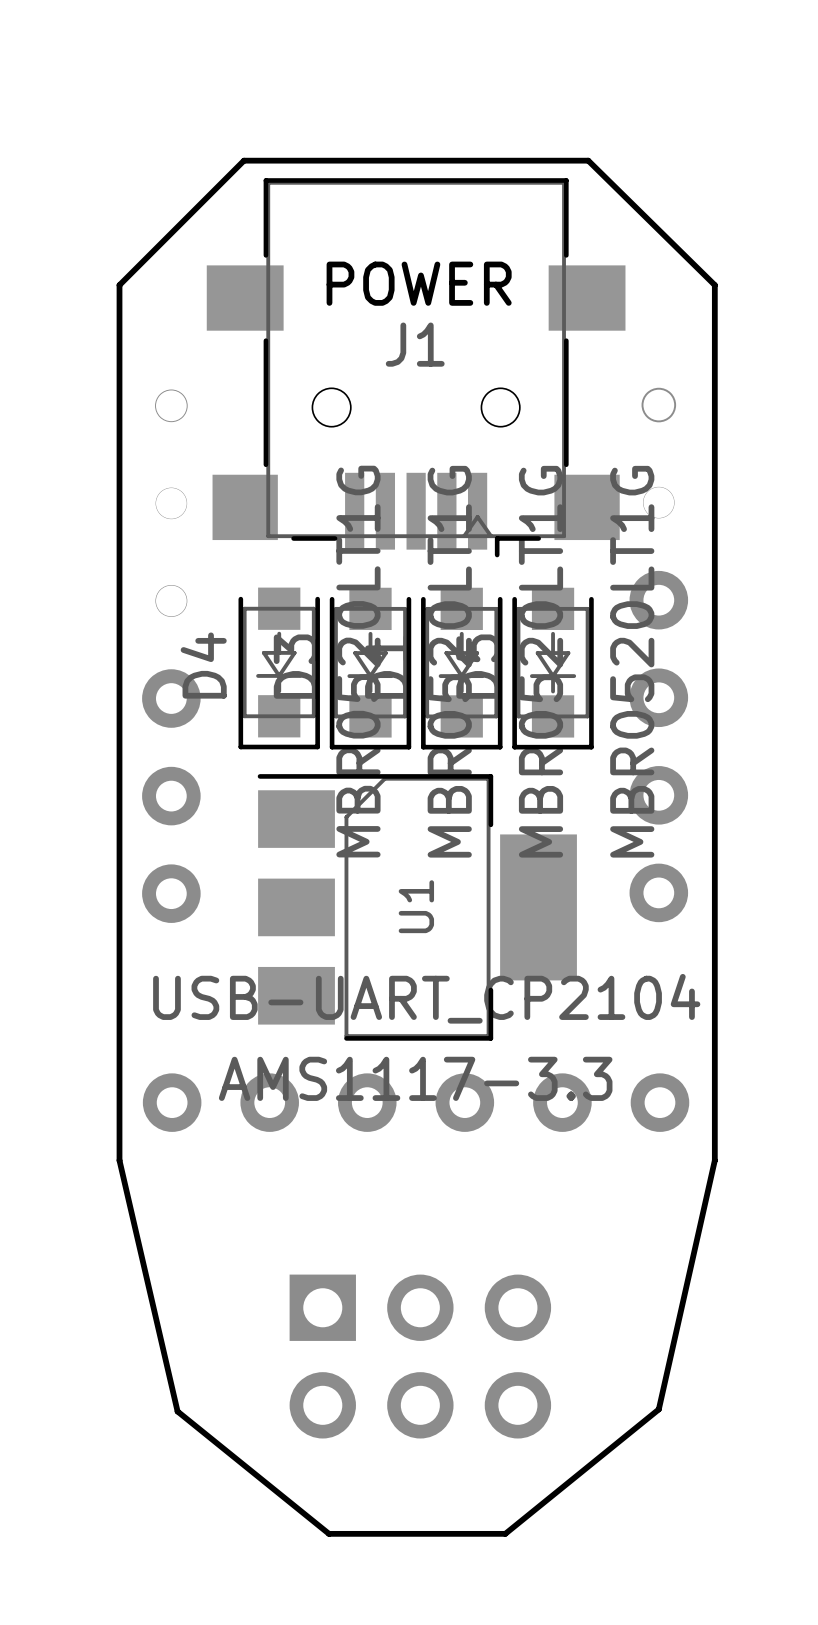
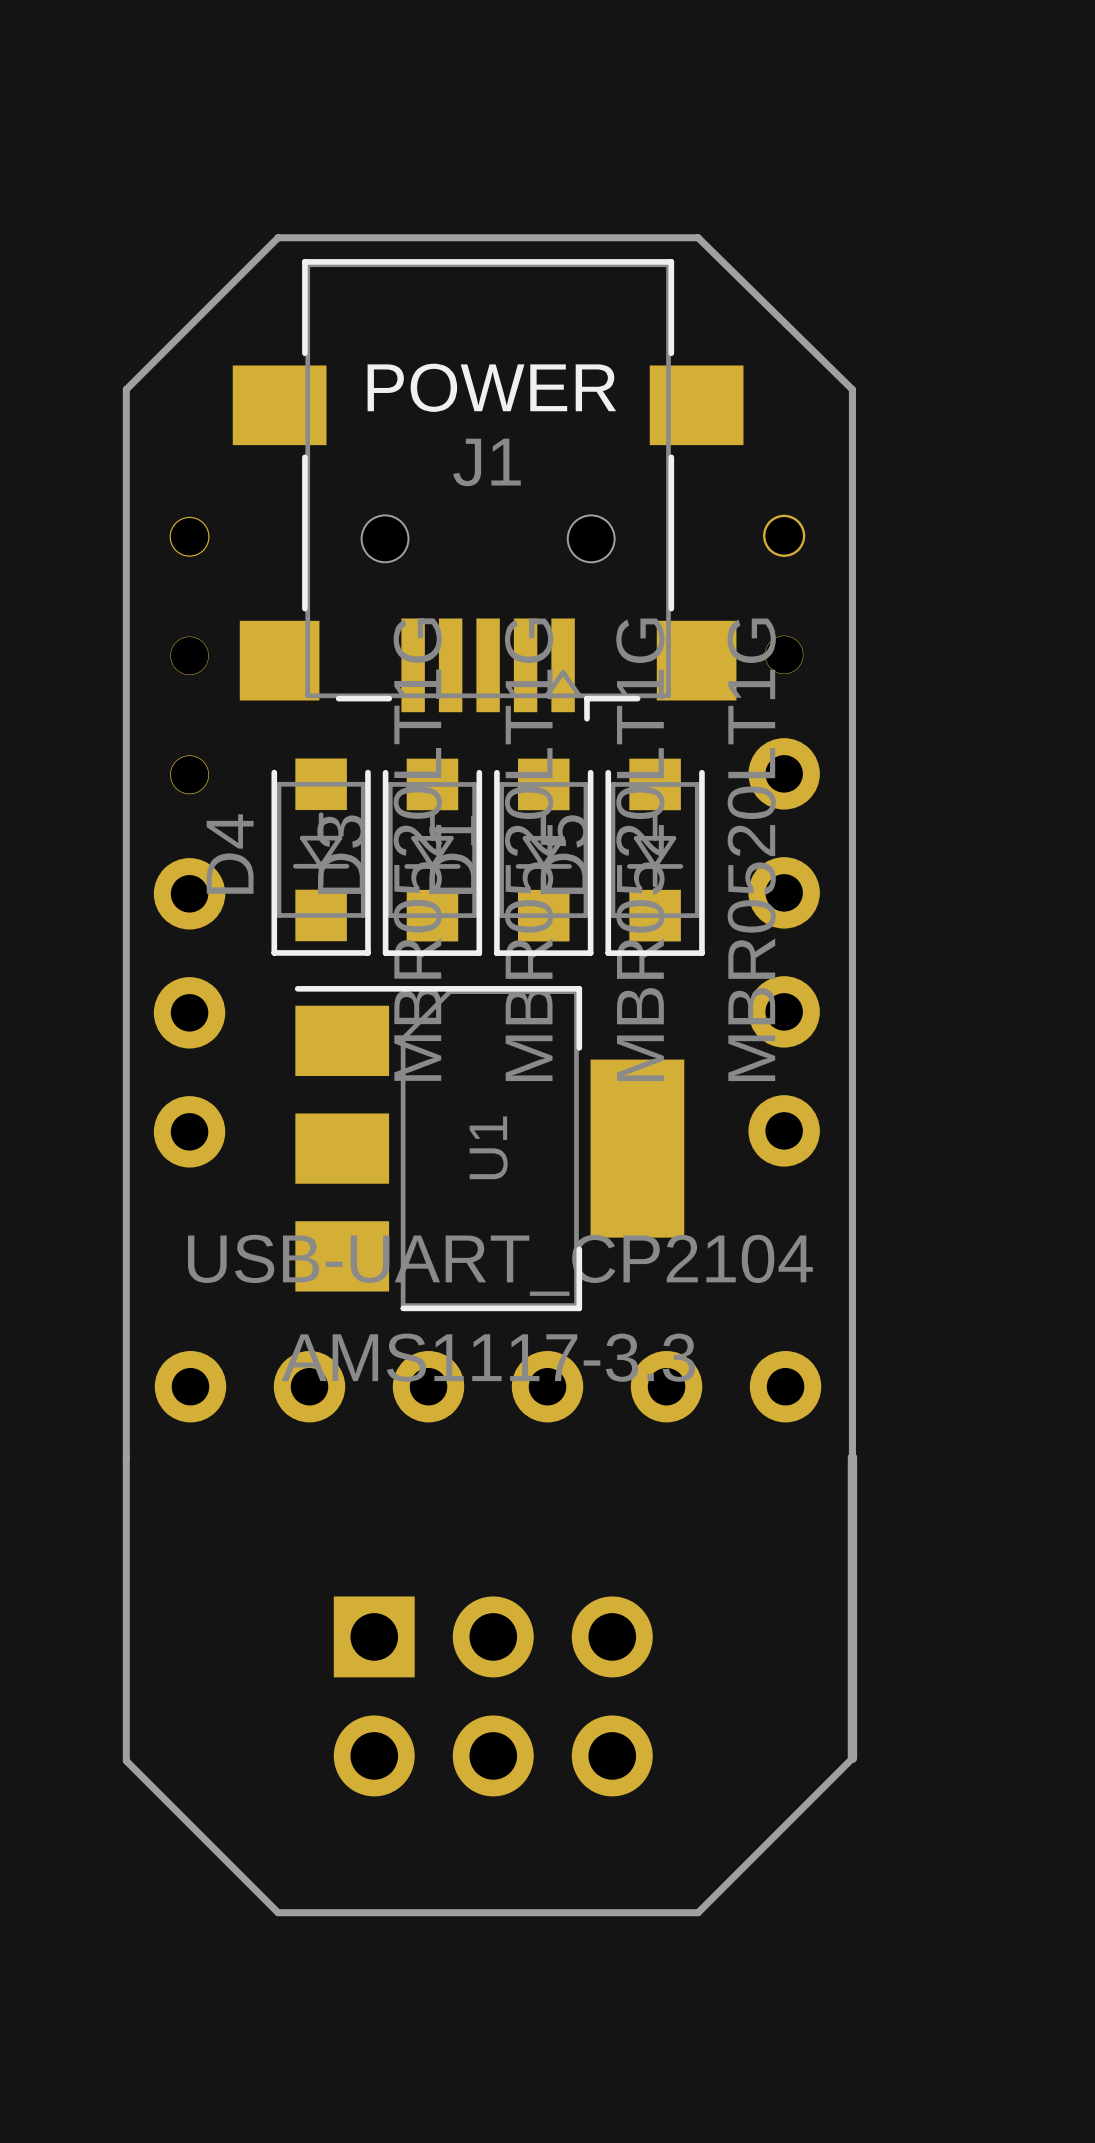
board edge: (119, 1160) (177, 1411) (329, 1533) -> (126, 1457) (126, 1760) (278, 1912) (381, 1912)
board edge: (714, 1160) (658, 1409) (505, 1533) -> (852, 1457) (852, 1758) (698, 1912) (596, 1912)

